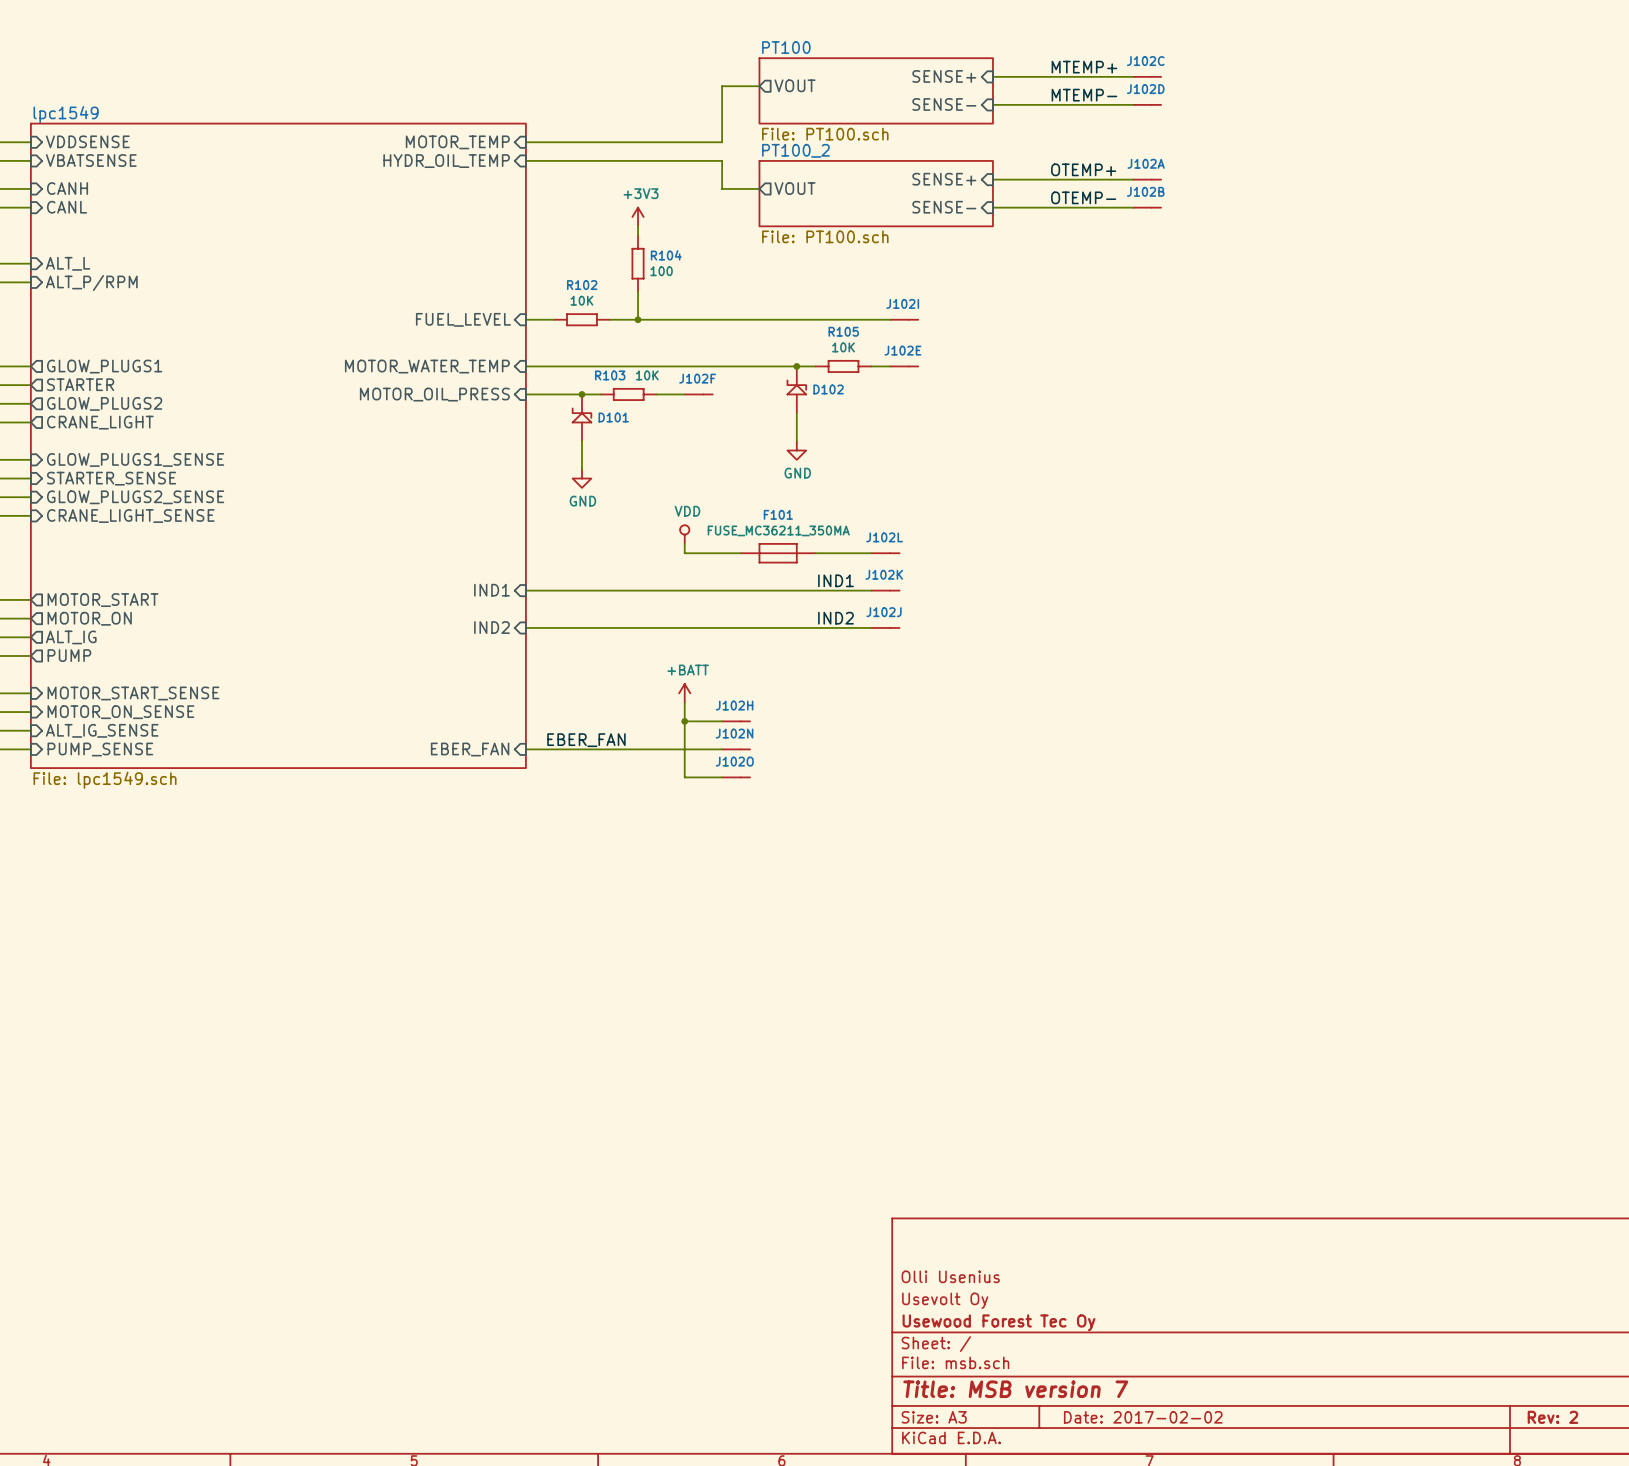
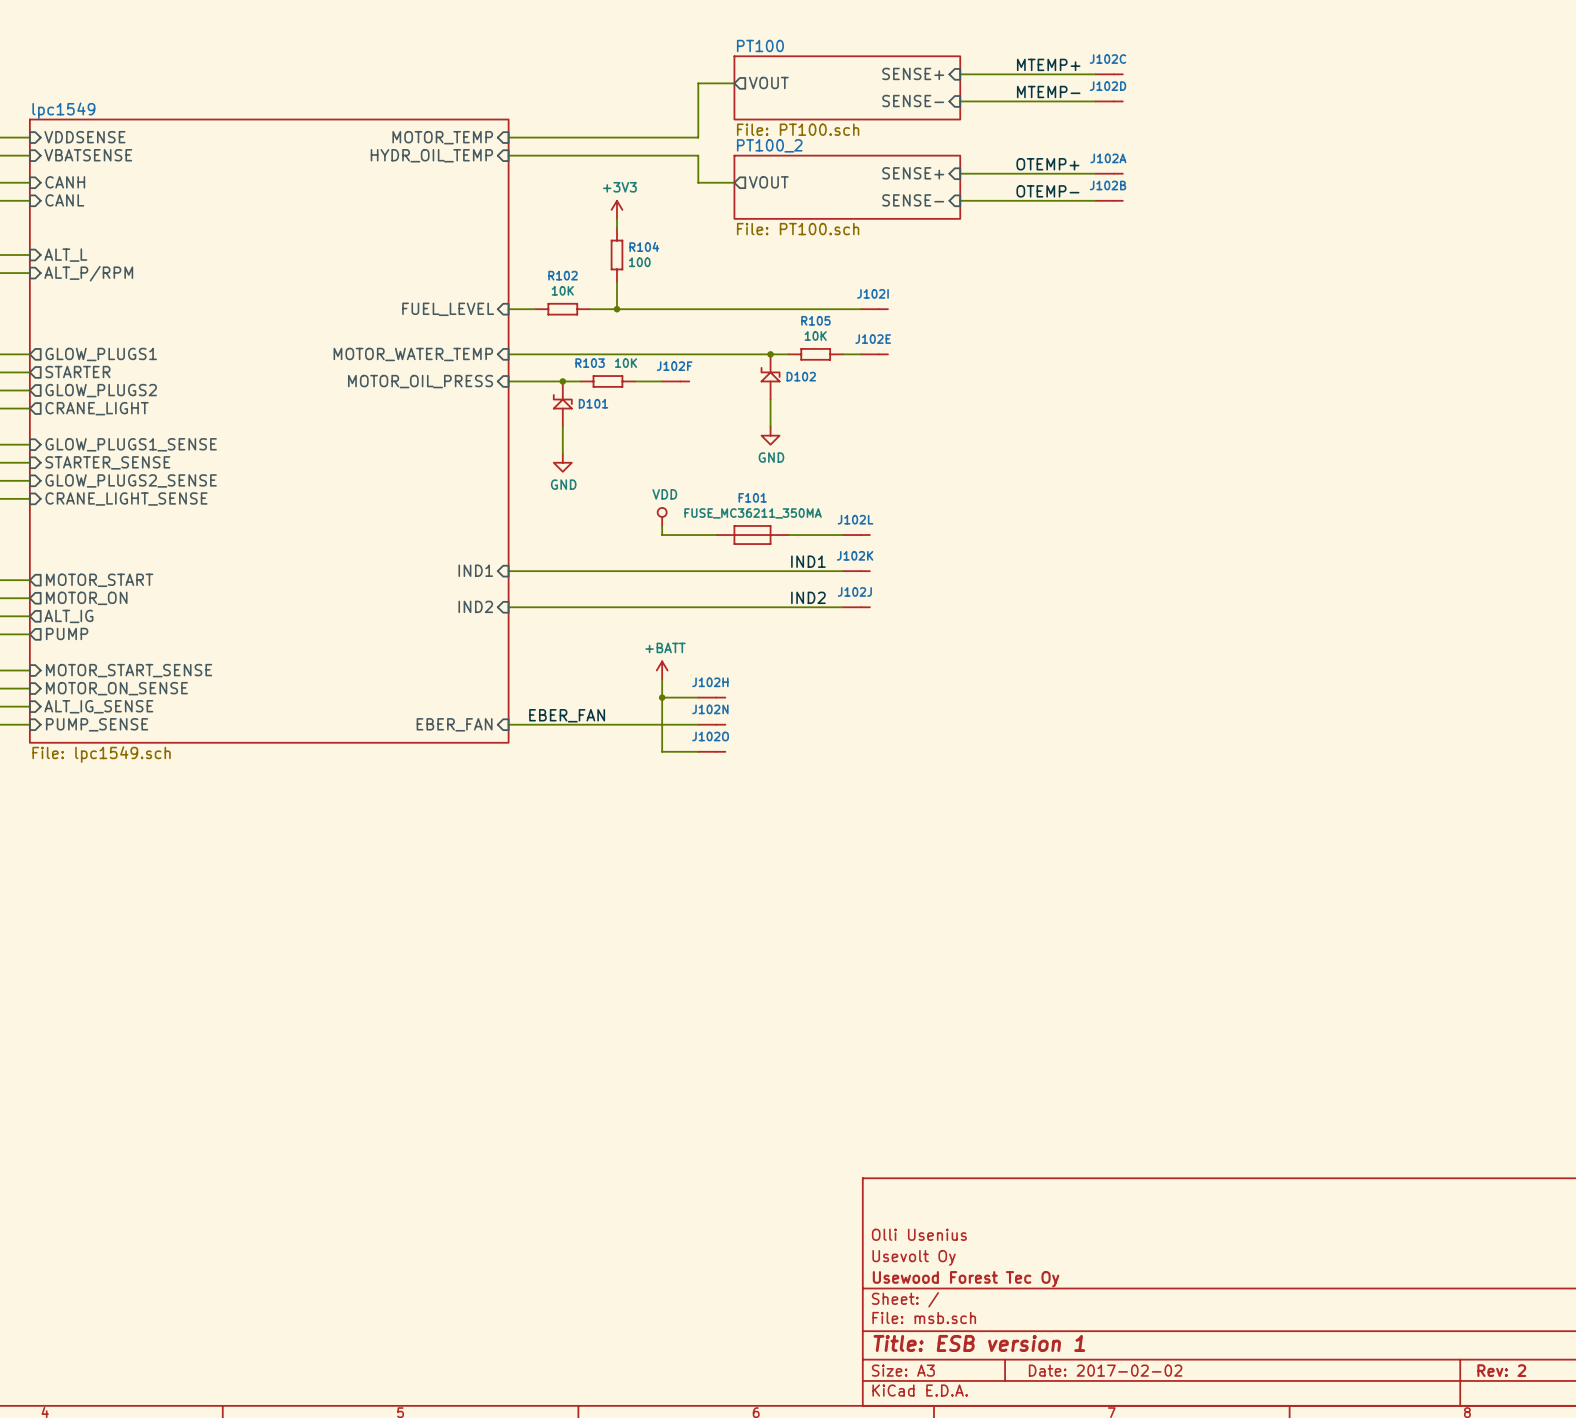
title block: Title: MSB version 7 (1015, 1389) -> Title: ESB version 1 (979, 1343)

